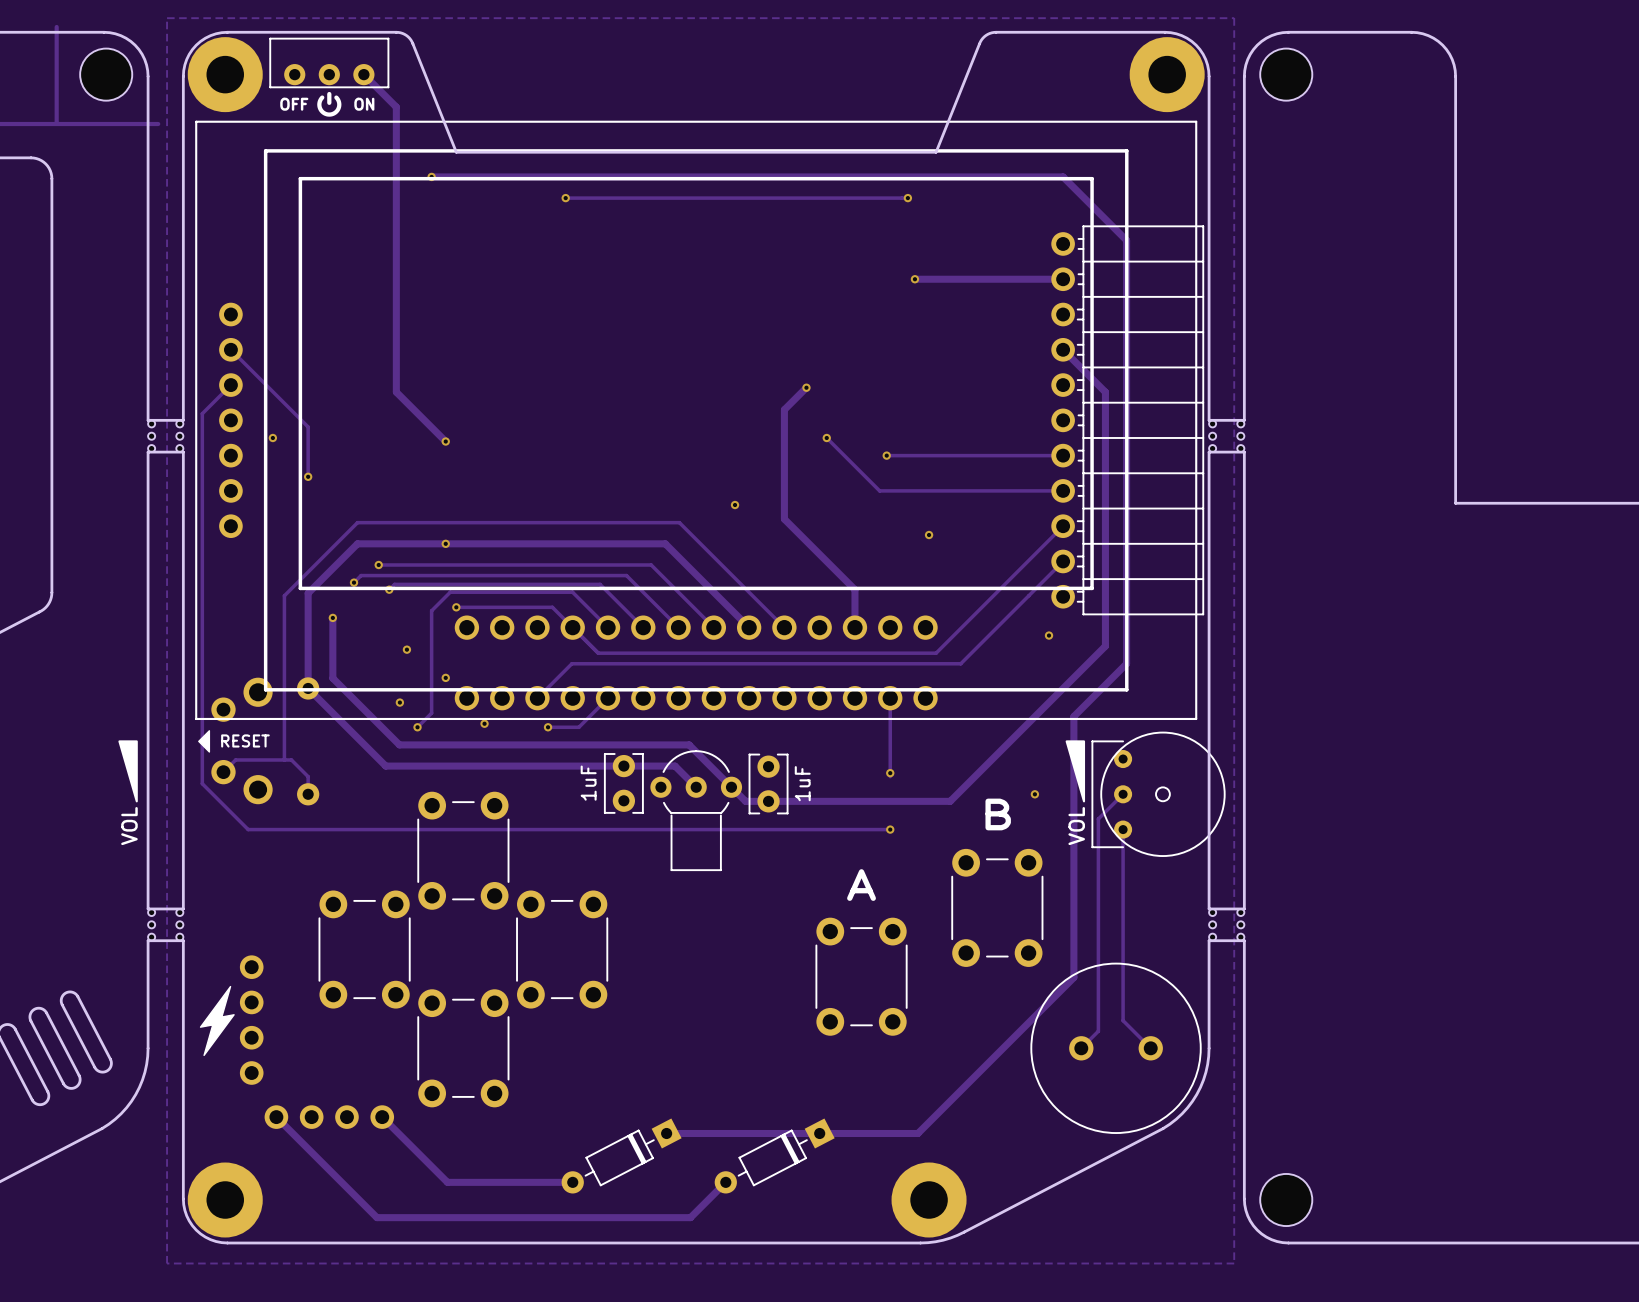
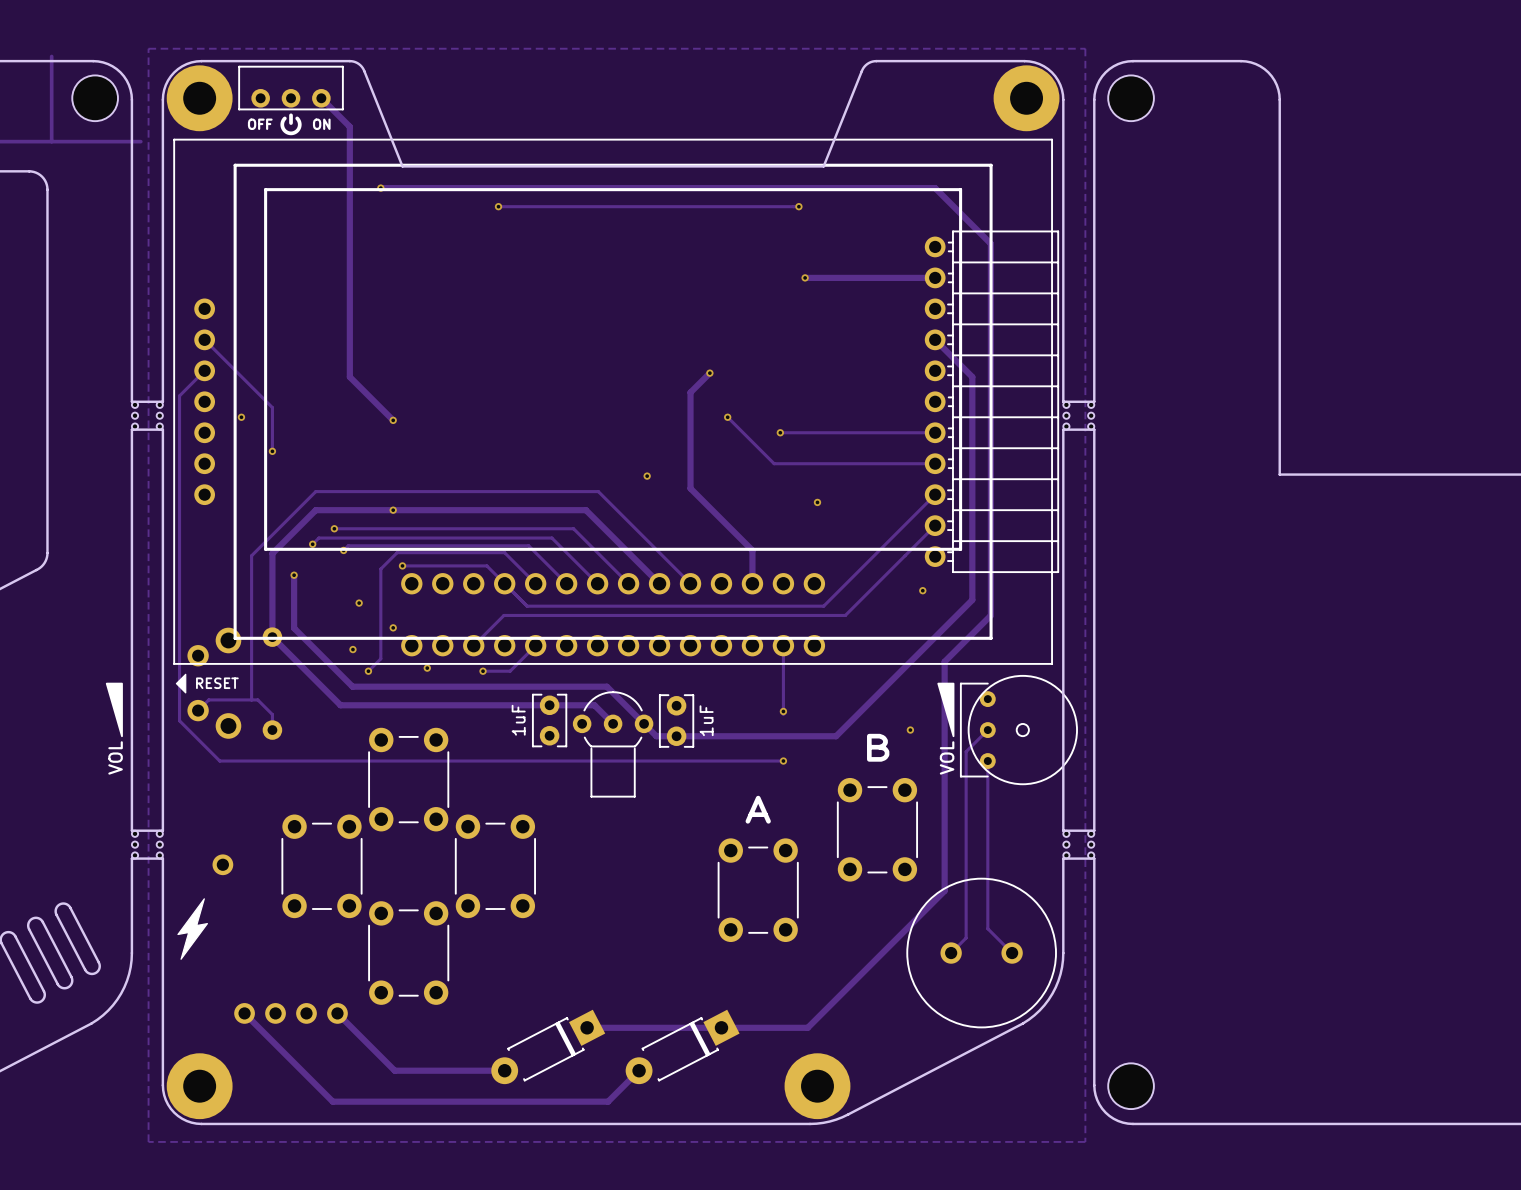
part: none -> (222, 864)
part: (251, 1020) -> none
part footprint: [561, 1118, 682, 1194] -> [491, 1009, 606, 1085]
part footprint: [714, 1118, 835, 1194] -> [625, 1009, 740, 1085]

